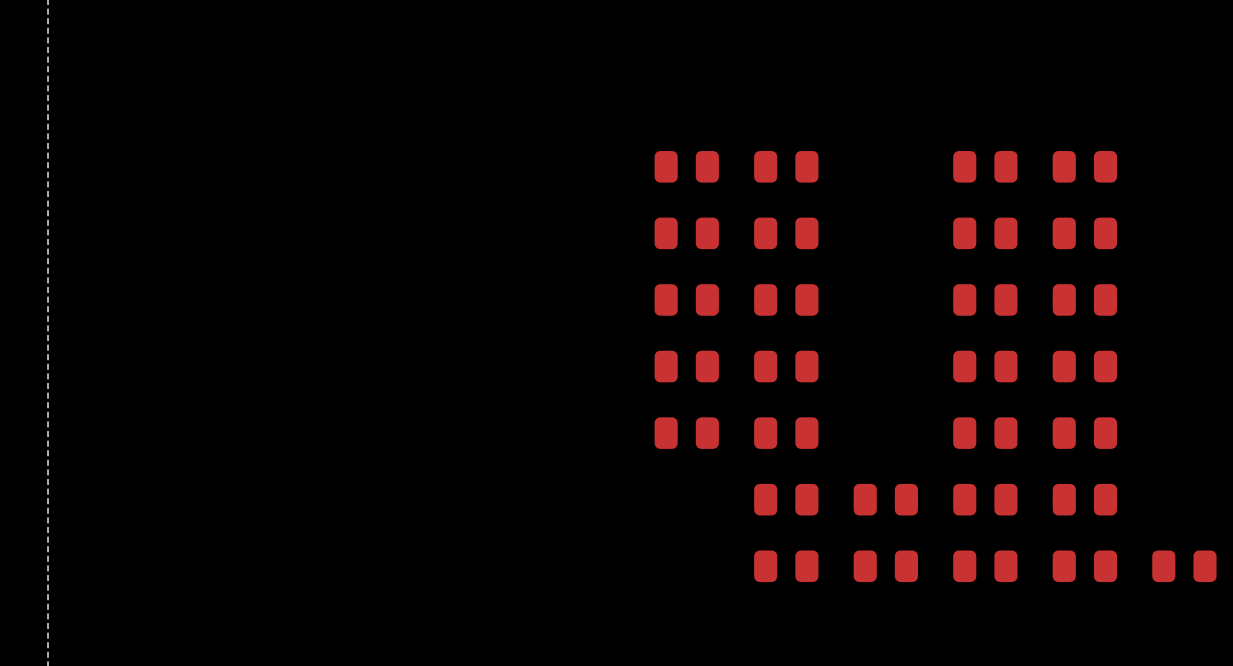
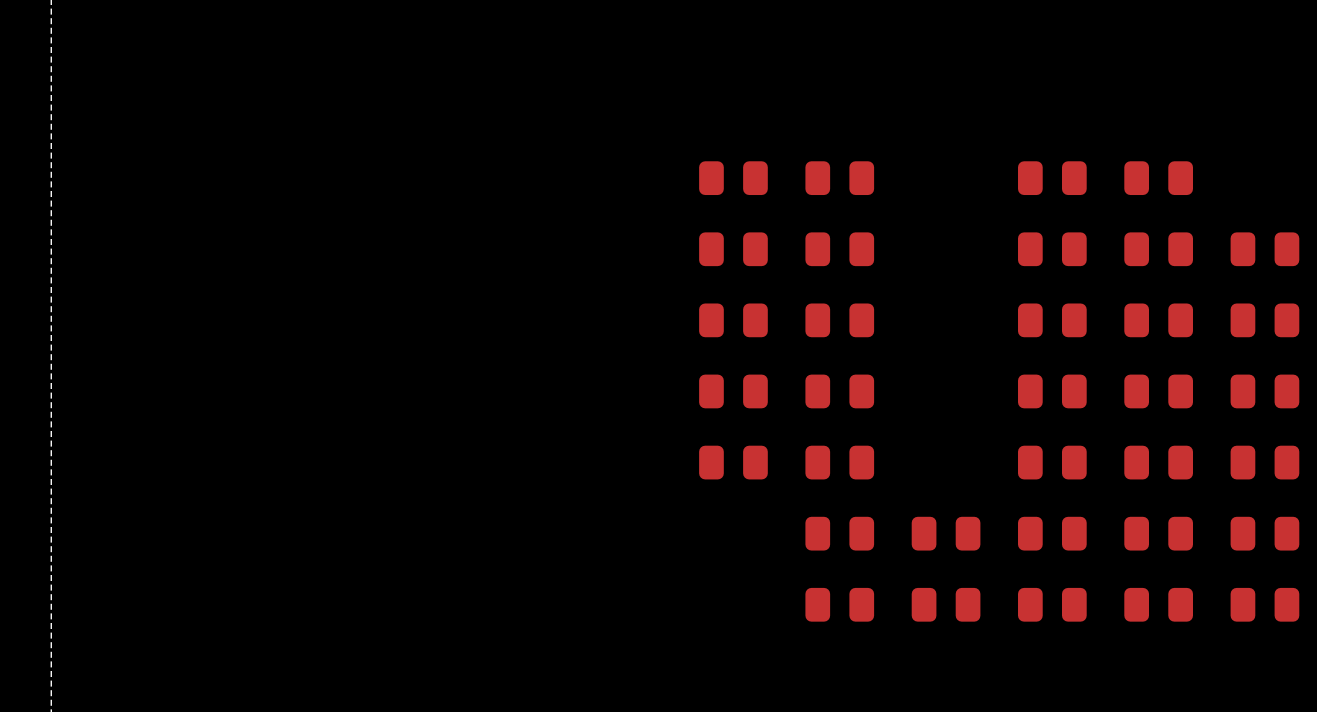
part: none -> (1264, 249)
part: none -> (1264, 320)
part: none -> (1264, 391)
part: none -> (1264, 462)
part: none -> (1264, 533)

